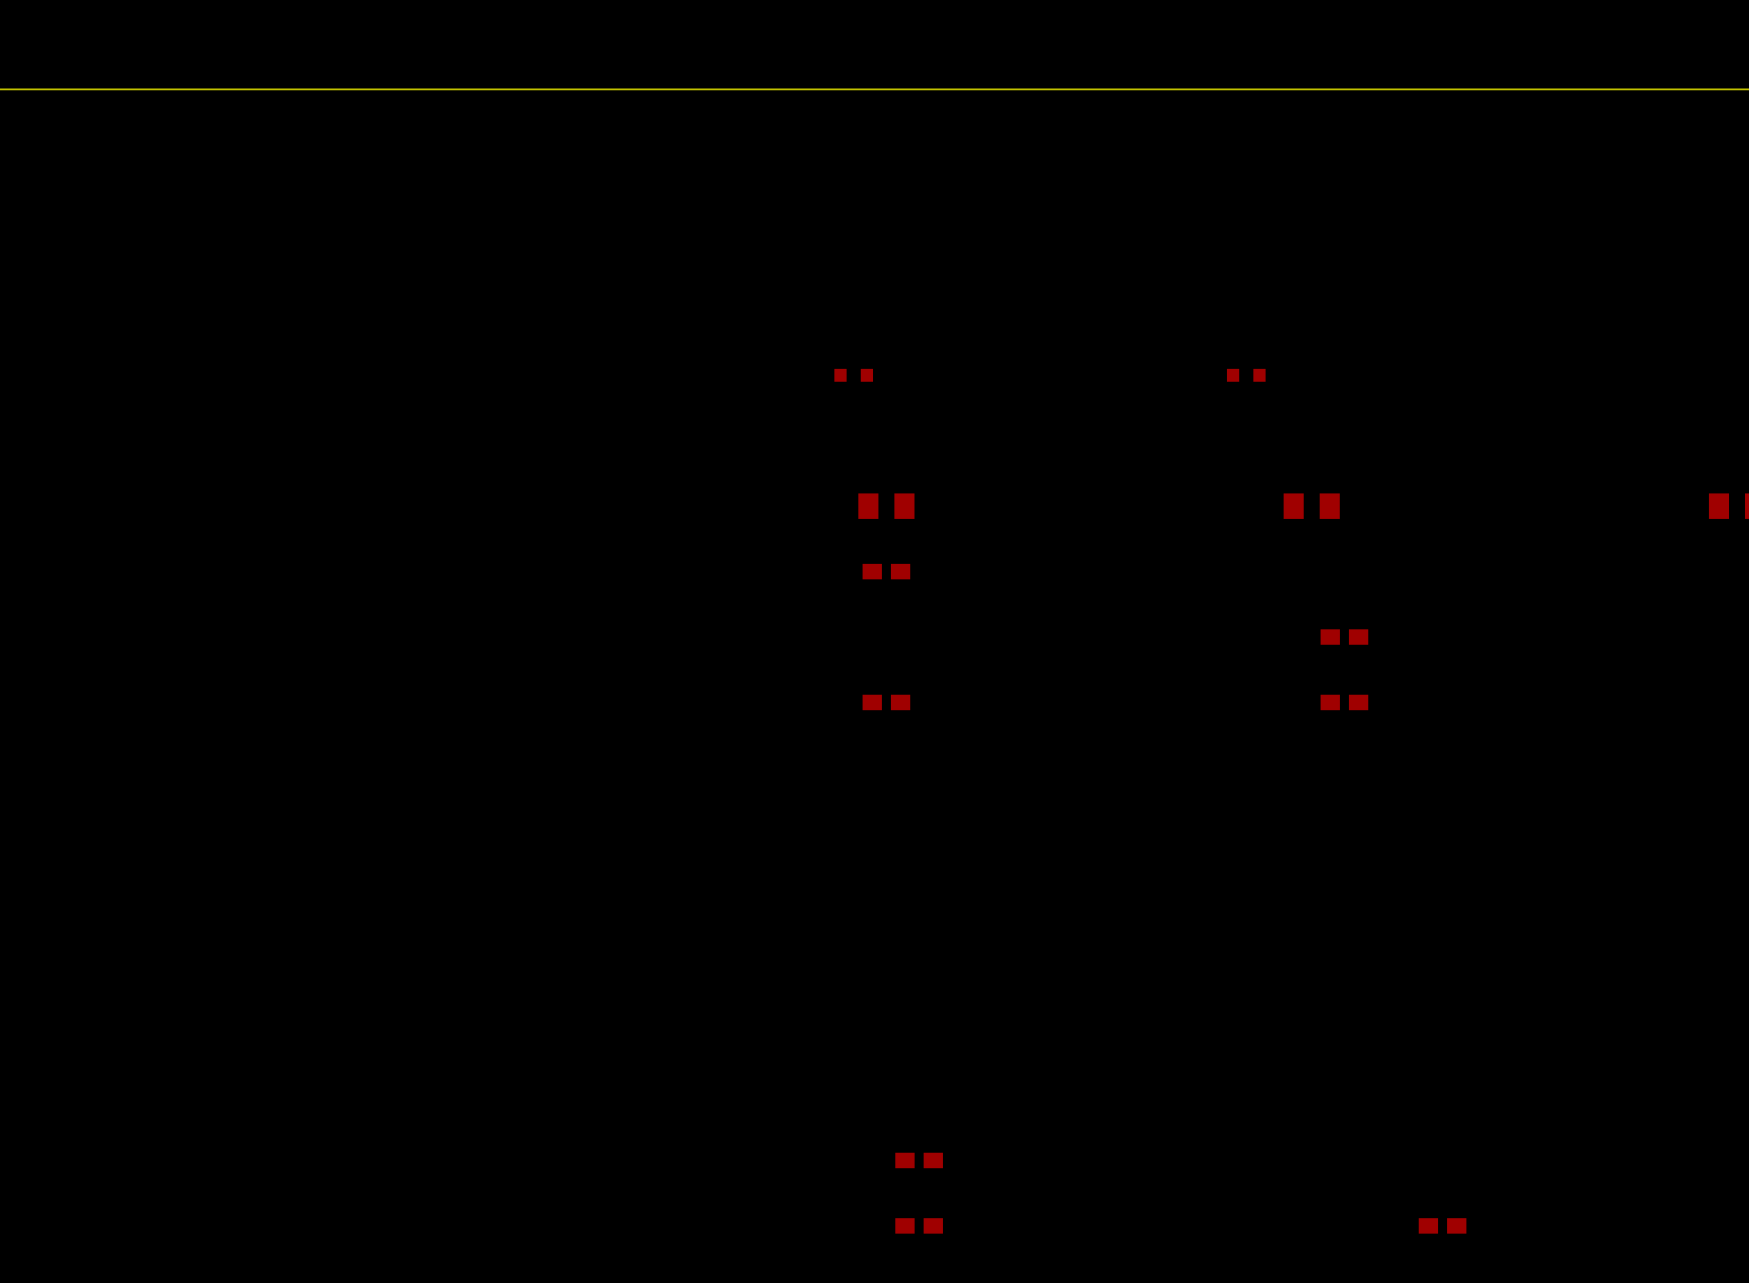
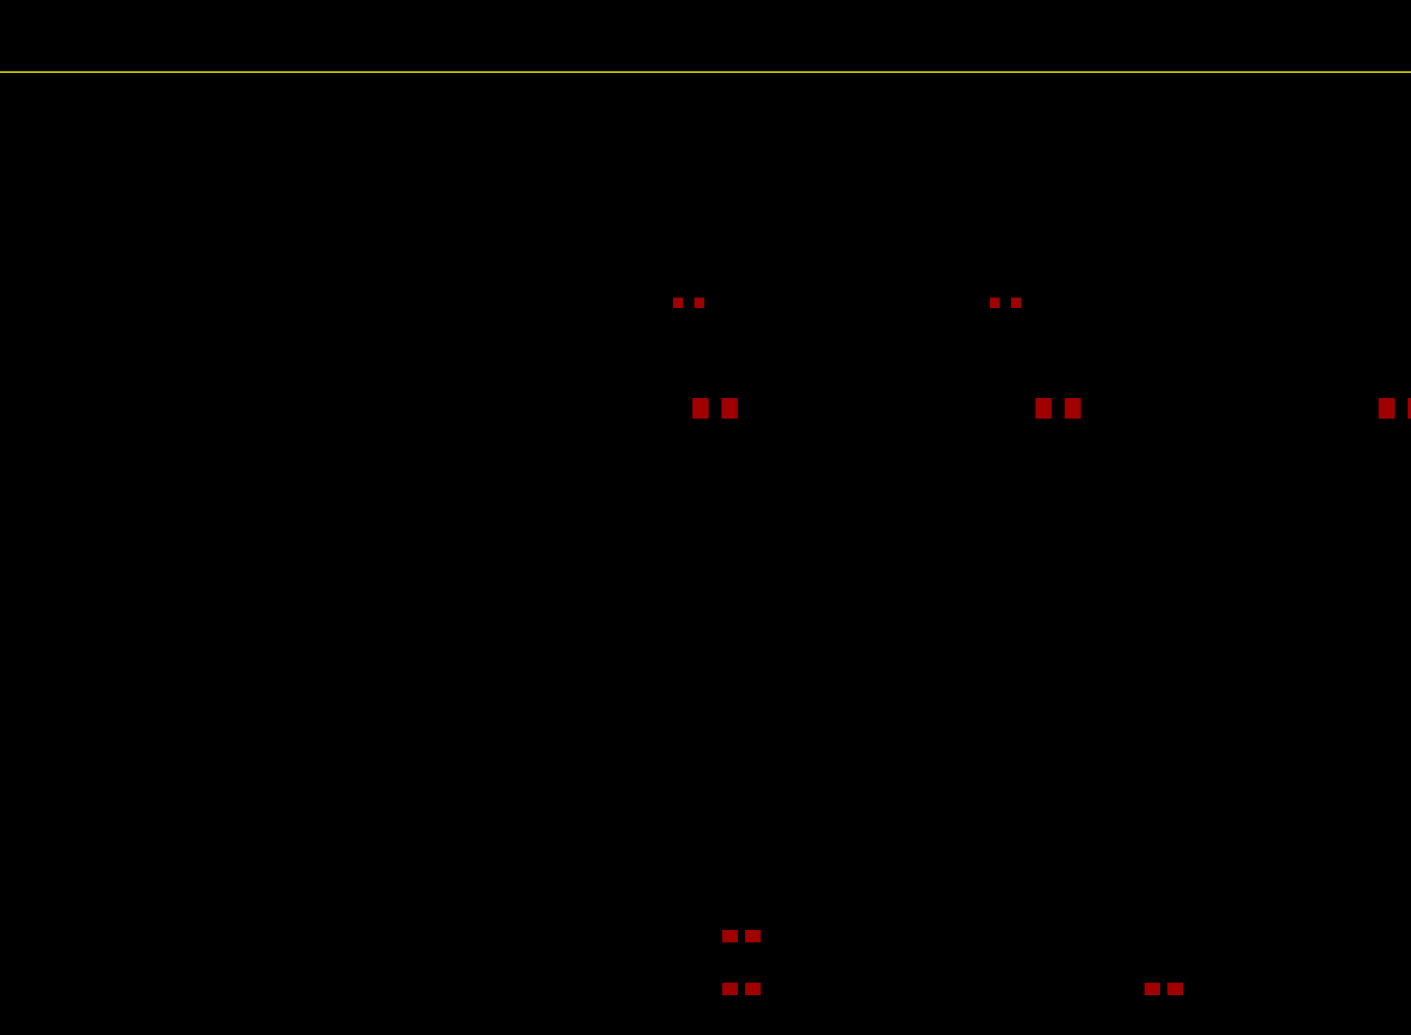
part: (886, 571) -> none
part: (1344, 637) -> none
part: (886, 702) -> none
part: (1344, 702) -> none

